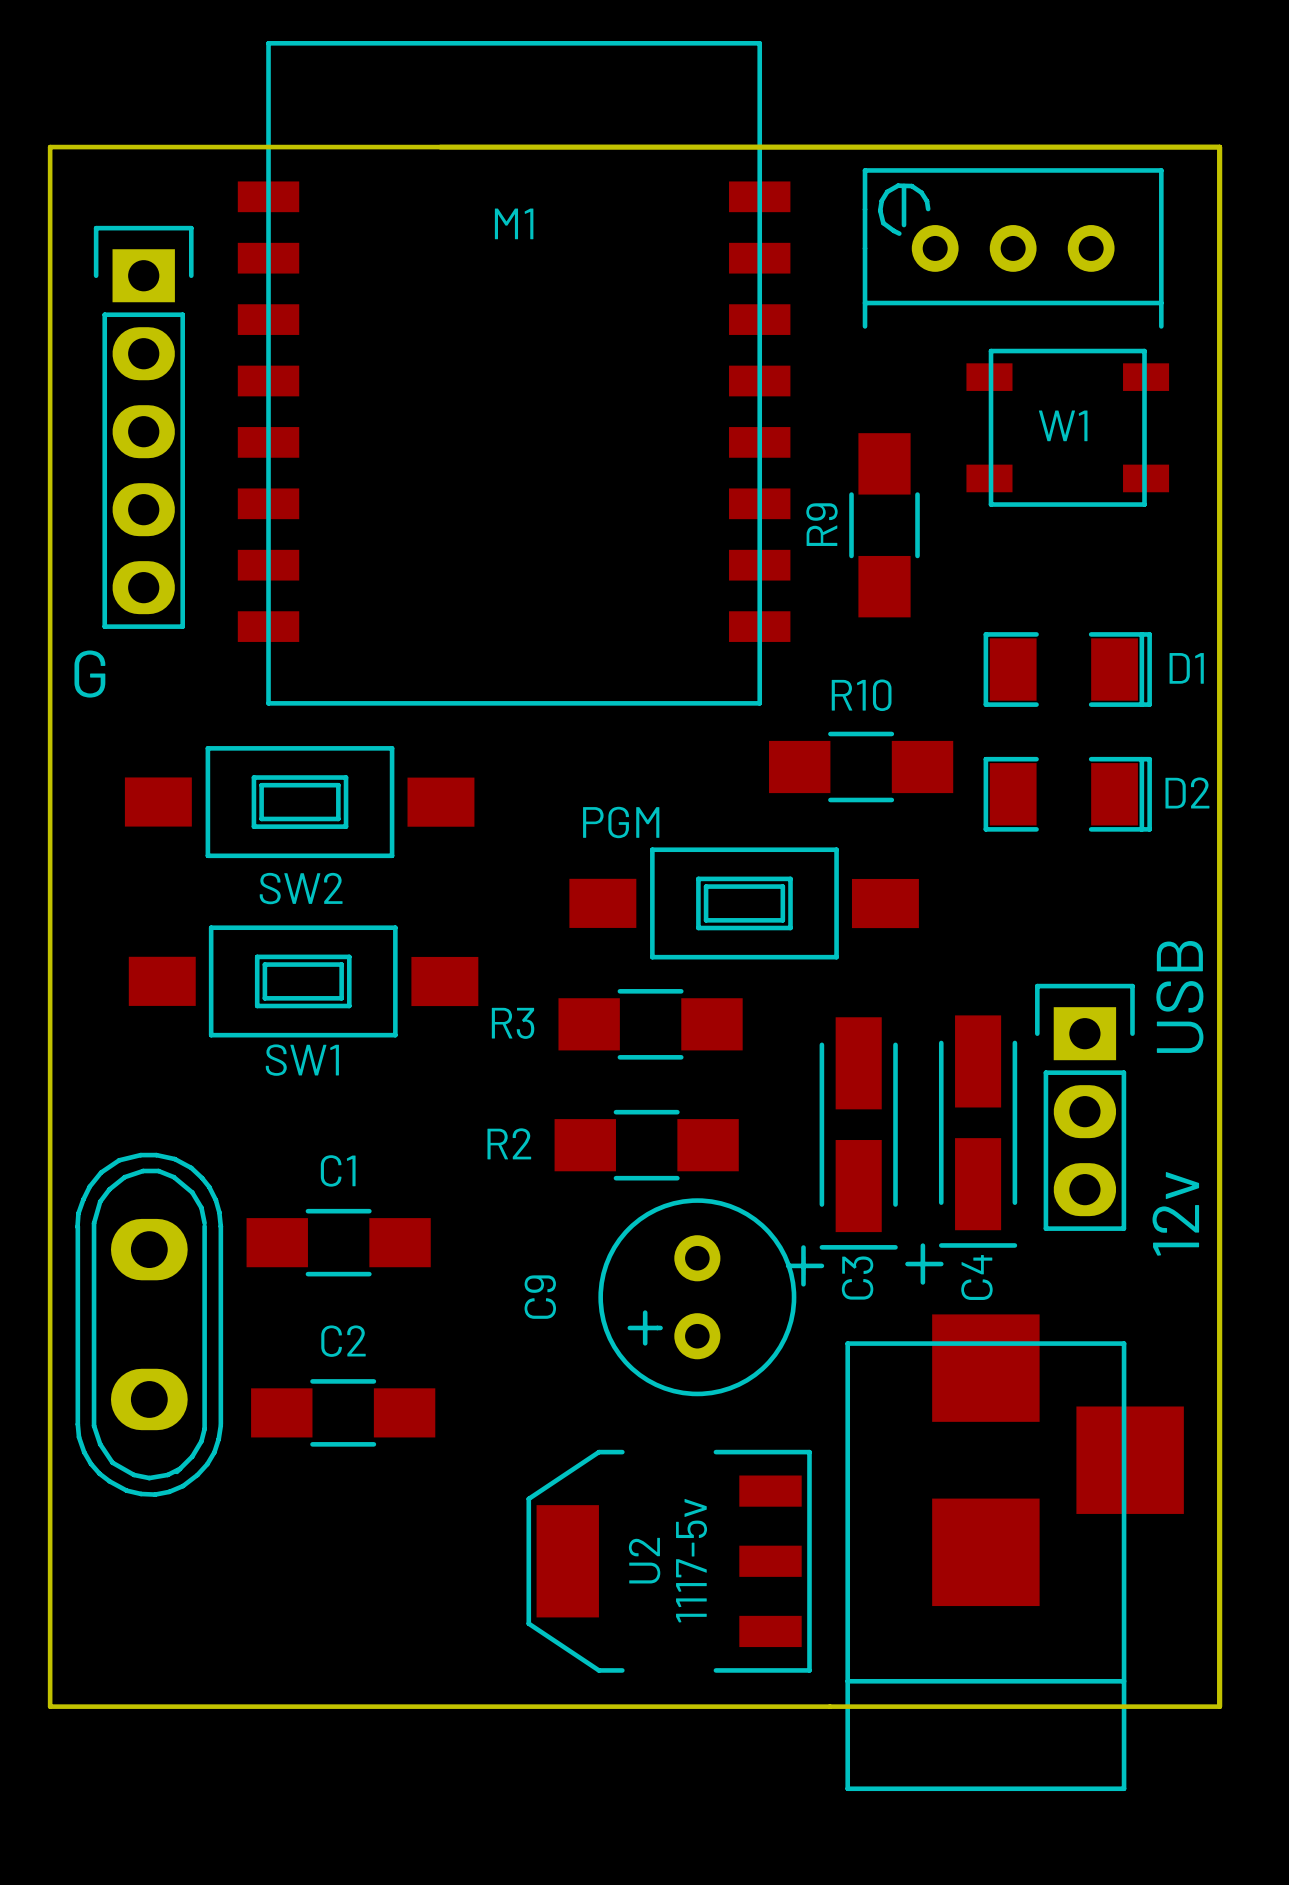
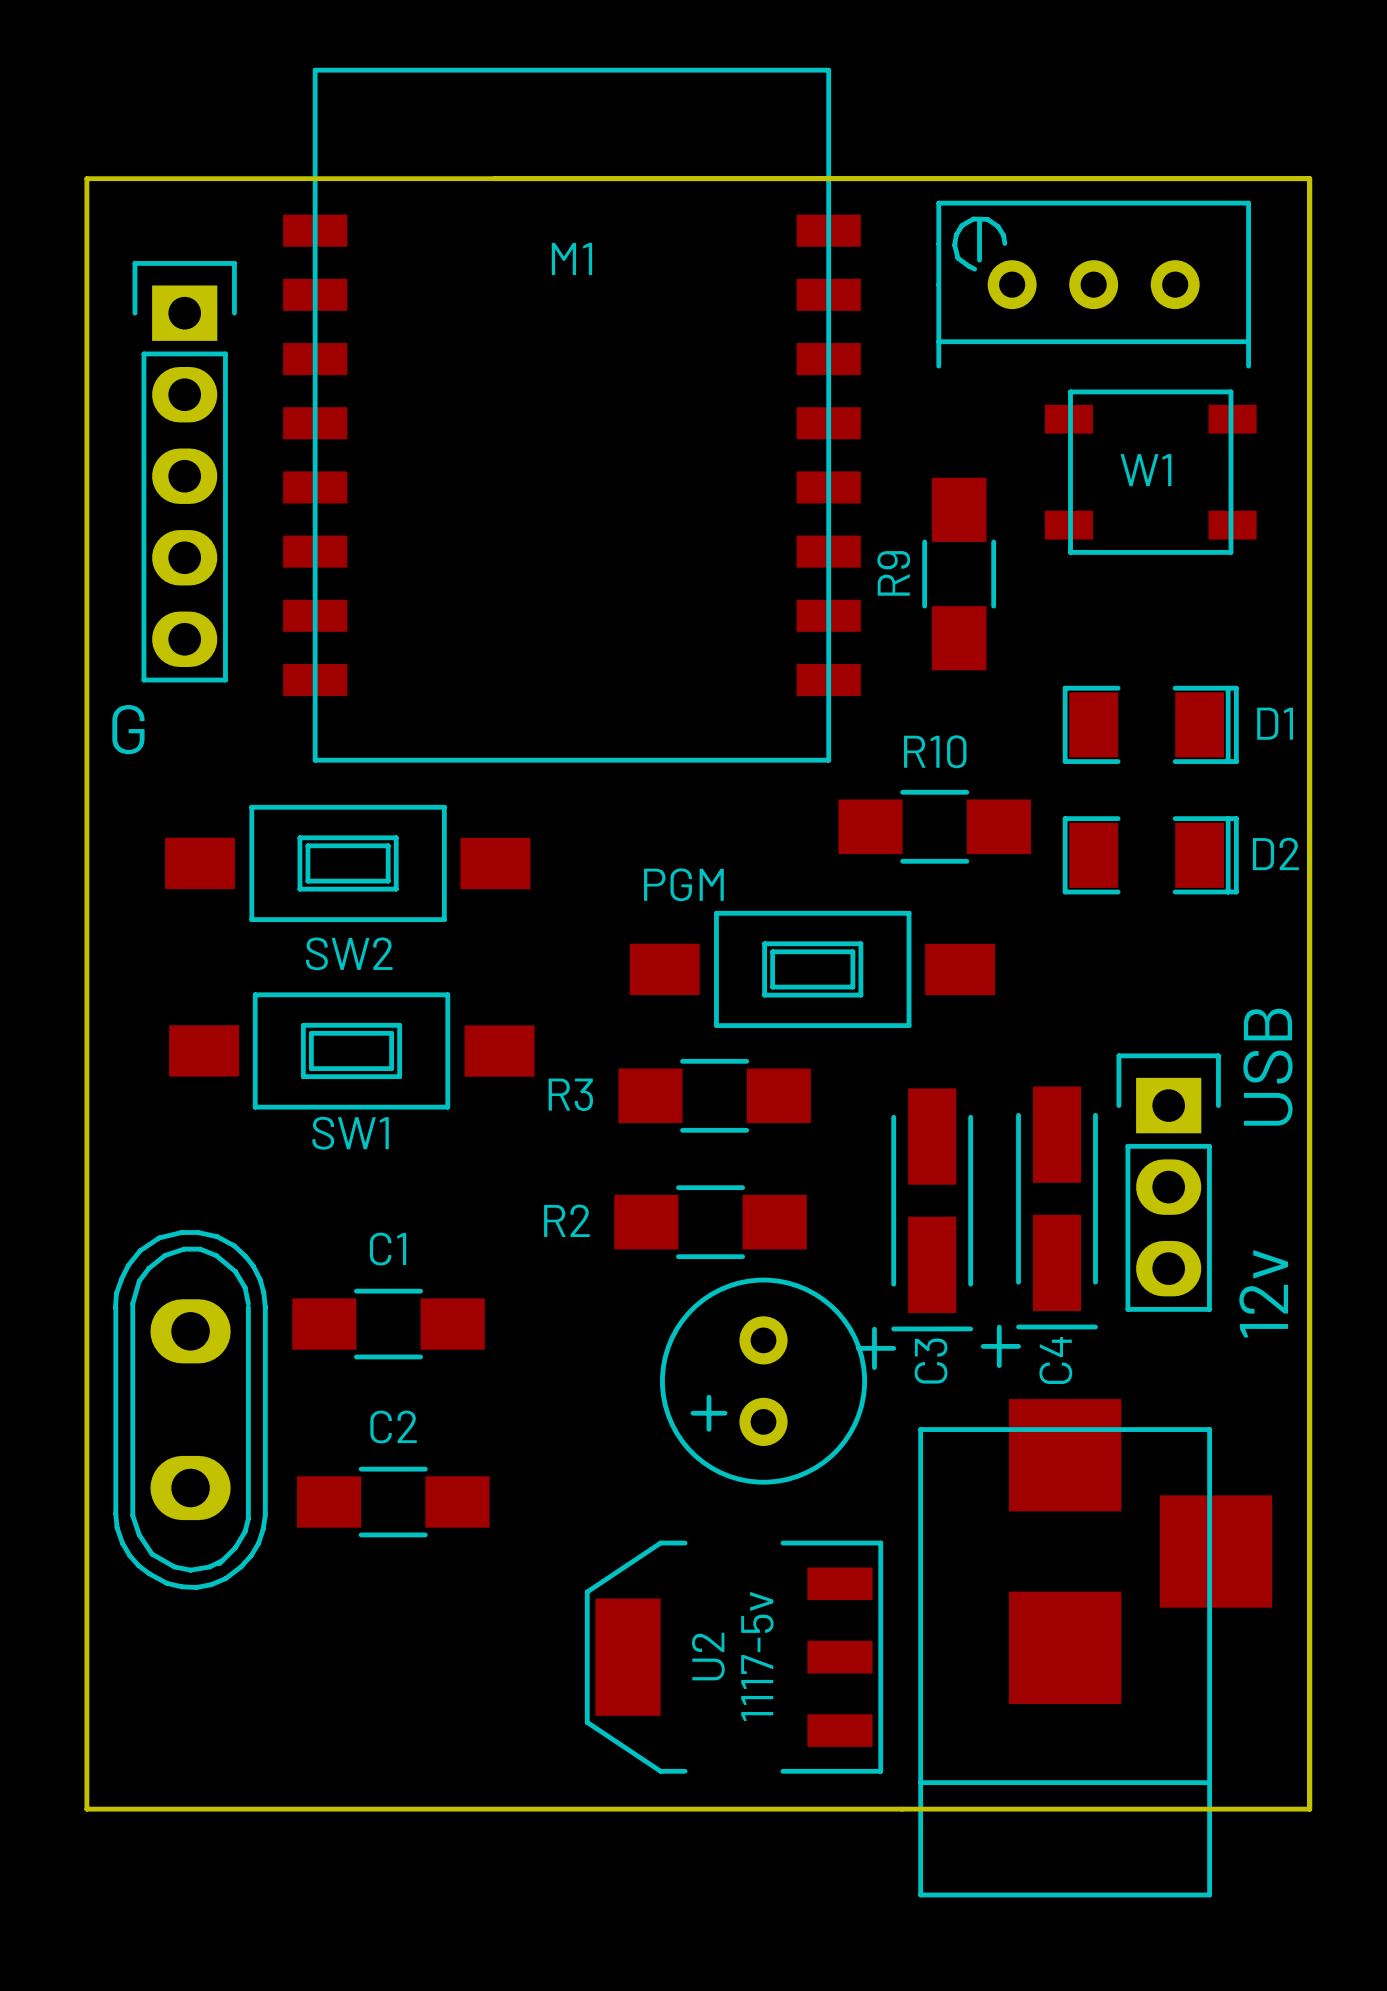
C9: (697, 1297) -> none

